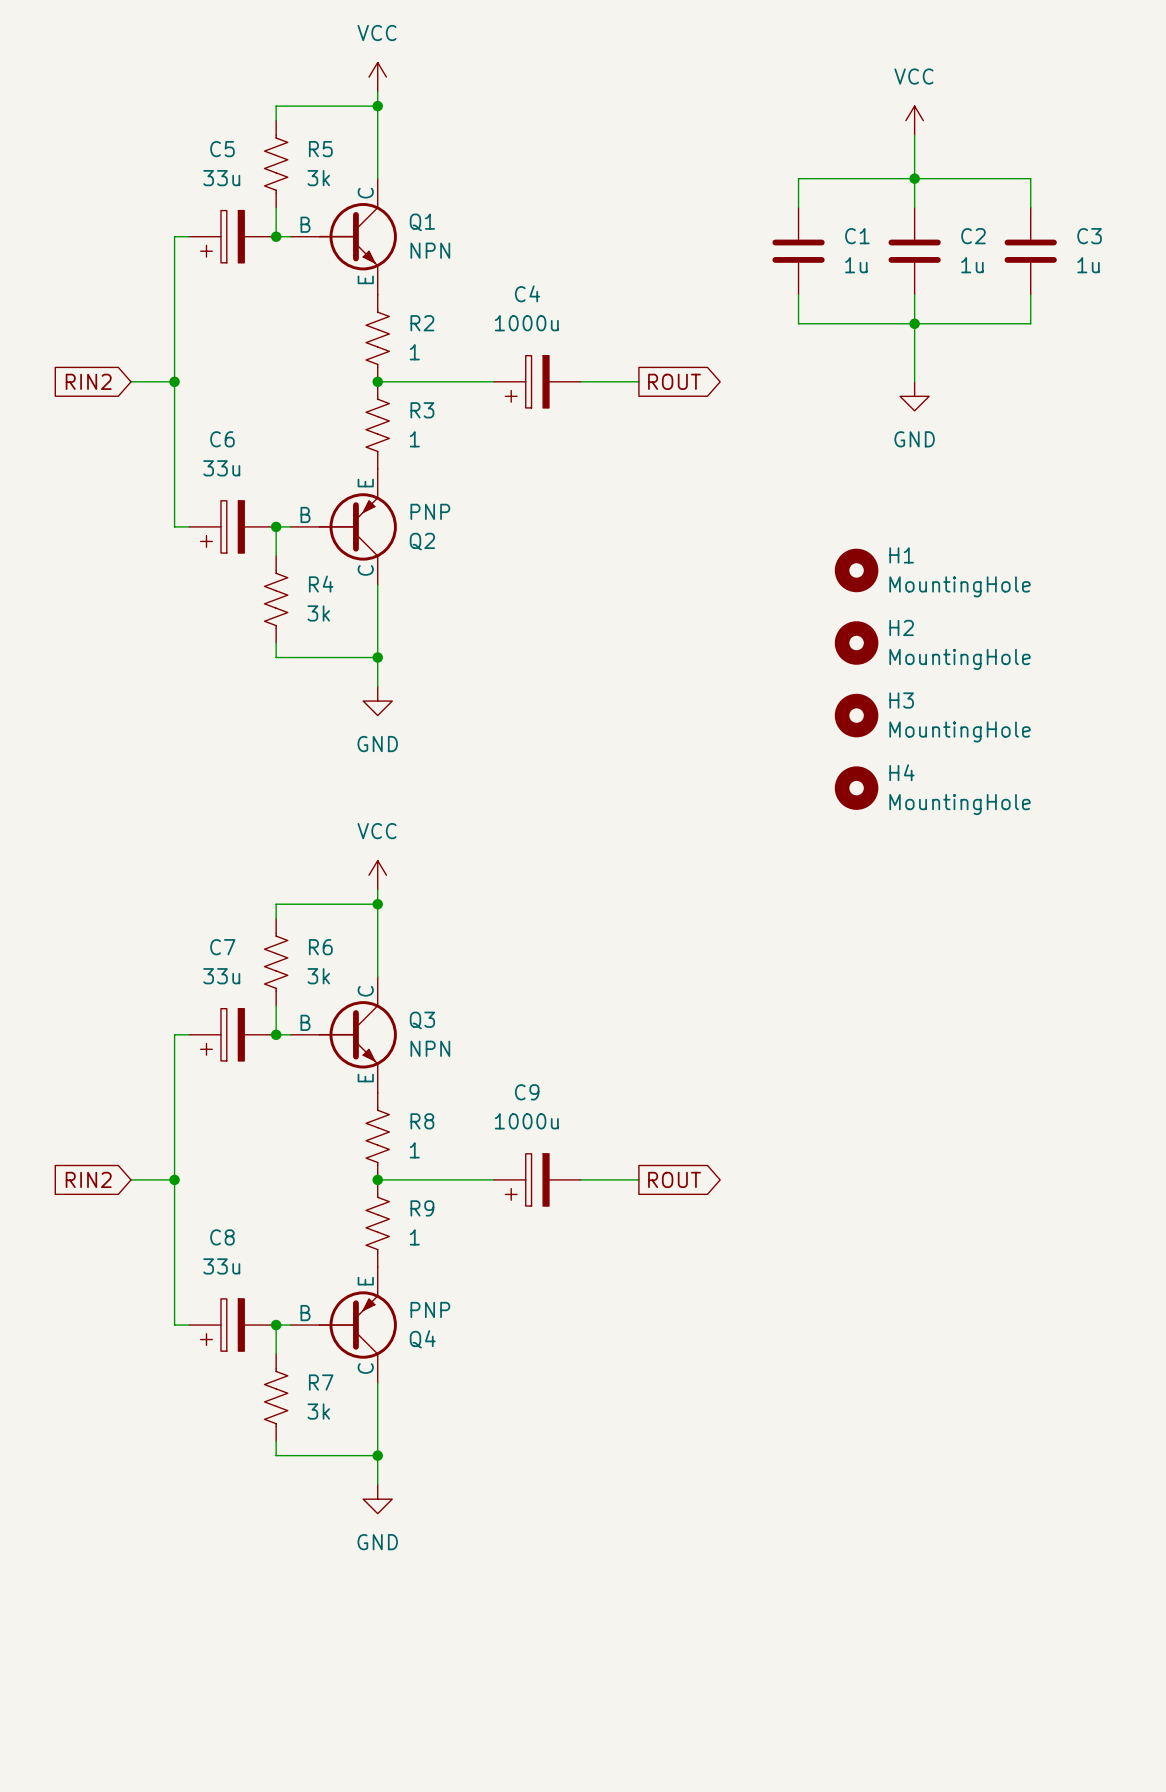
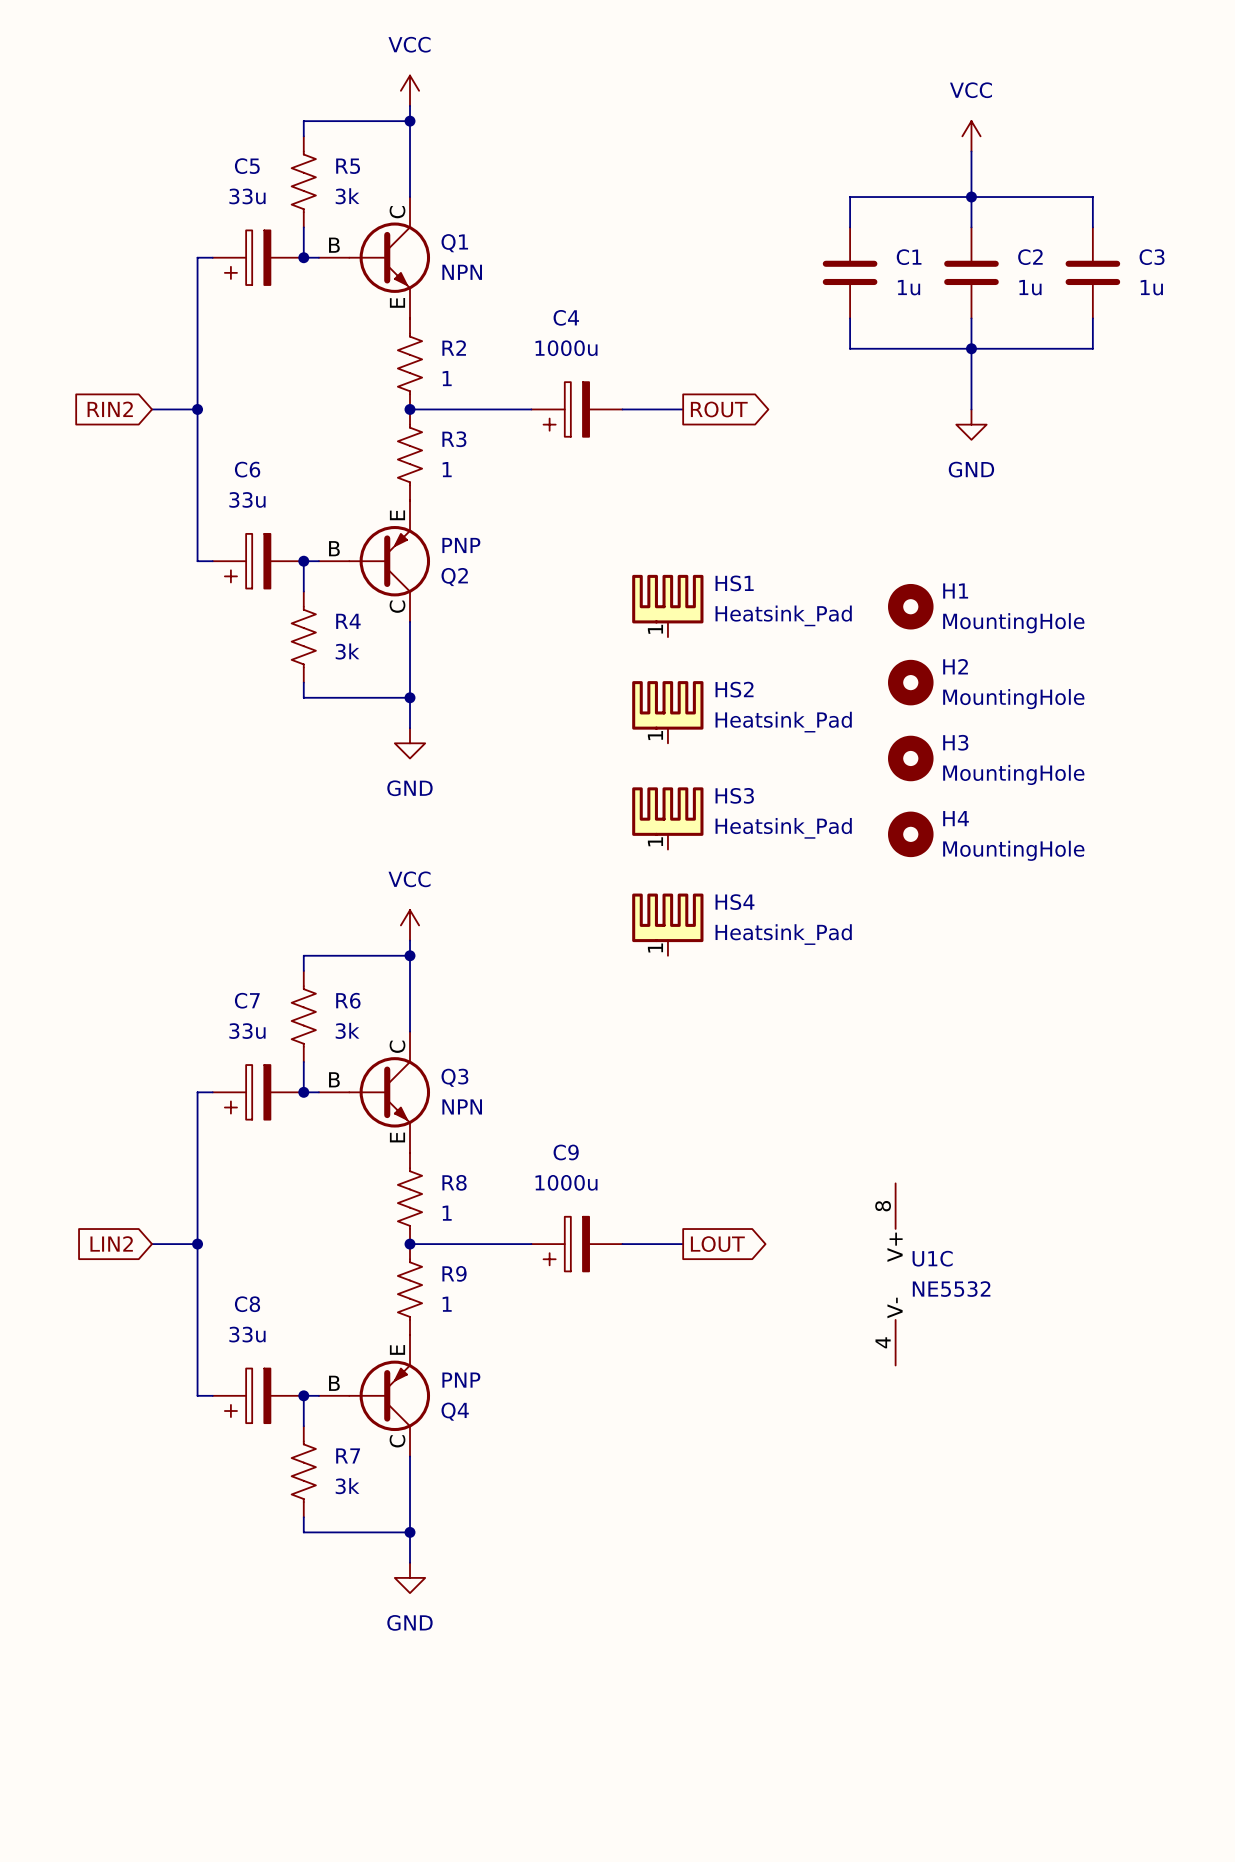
HS1: none -> Heatsink_Pad (667, 605)
HS2: none -> Heatsink_Pad (667, 712)
HS3: none -> Heatsink_Pad (667, 818)
HS4: none -> Heatsink_Pad (667, 924)
global label: RIN2 (88, 1179) -> LIN2 (111, 1243)
global label: ROUT (674, 1179) -> LOUT (717, 1244)
U1C: none -> NE5532 (895, 1274)

